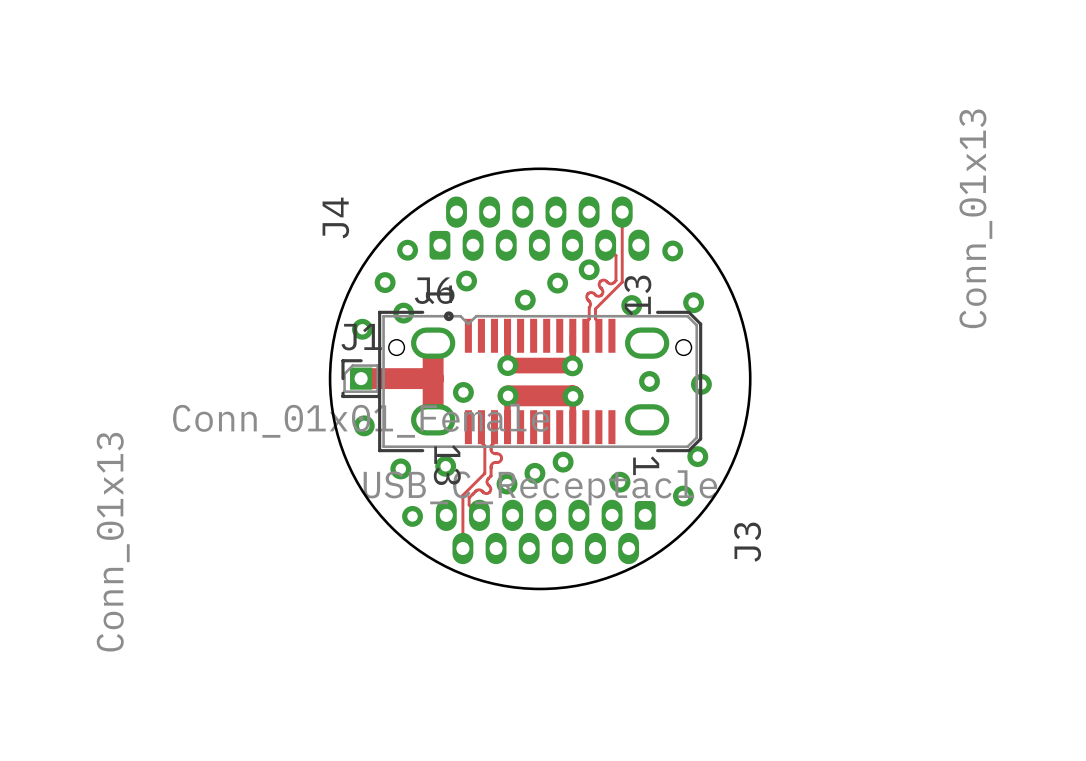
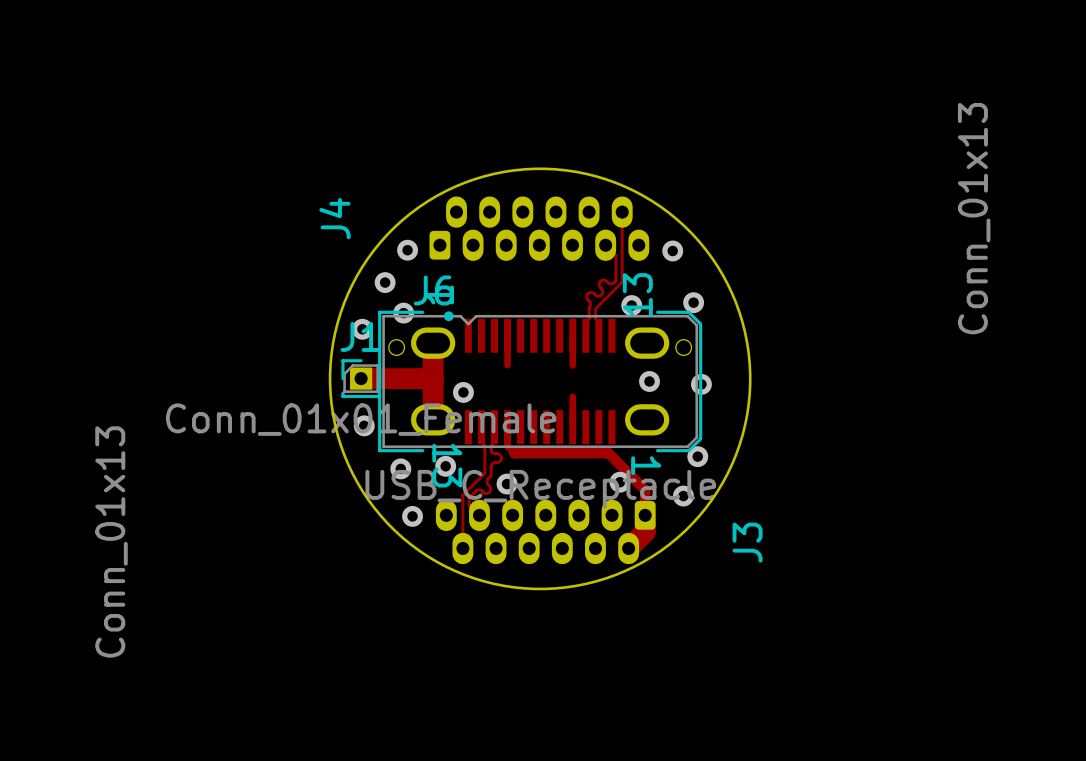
via: (589, 269) -> none
via: (466, 281) -> none
via: (557, 283) -> none
via: (525, 300) -> none
track: (507, 365) (572, 365) -> none
via: (507, 365) -> none
via: (572, 365) -> none
via: (508, 395) -> none
track: (573, 396) (508, 395) (507, 427) -> (628, 548) (645, 531) (645, 489) (608, 453) (514, 453) (507, 446) (507, 427)
via: (573, 396) -> none
via: (563, 462) -> none
via: (534, 473) -> none

